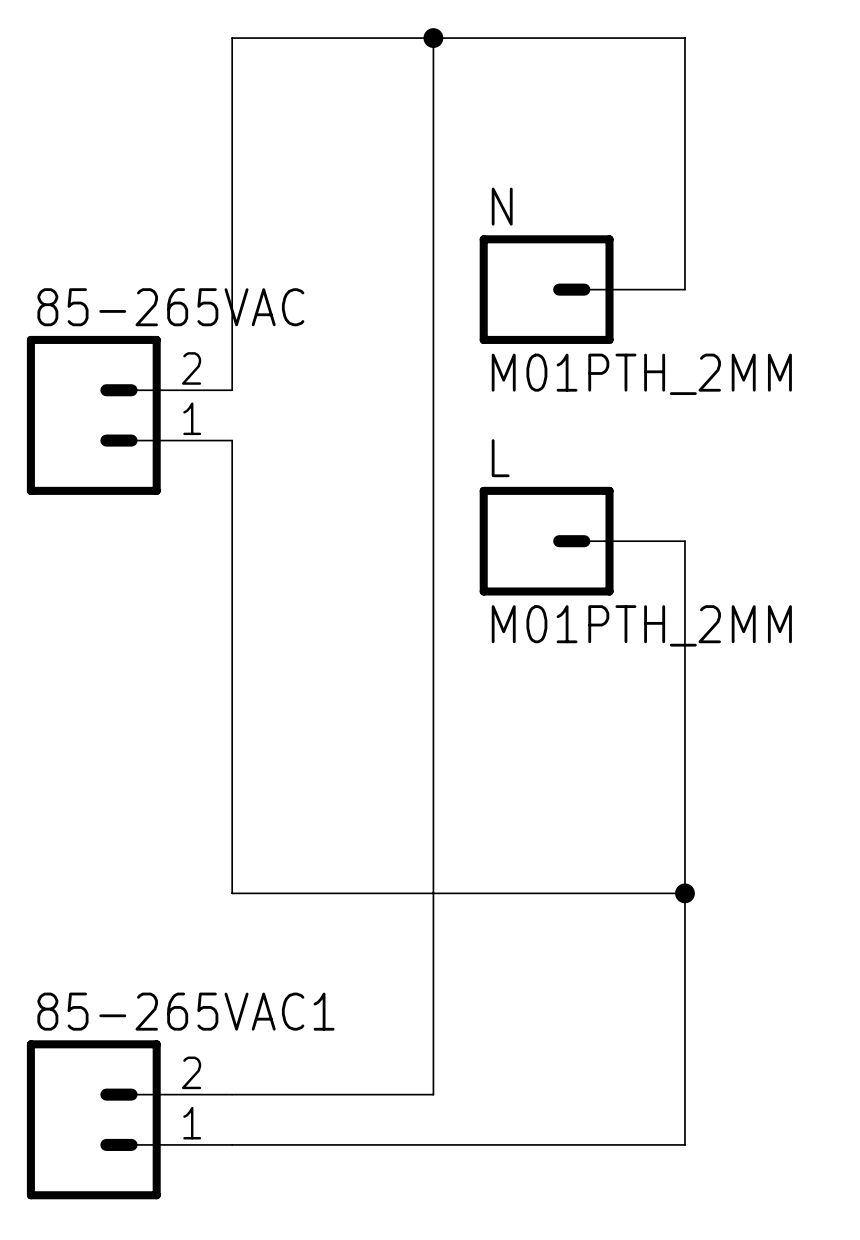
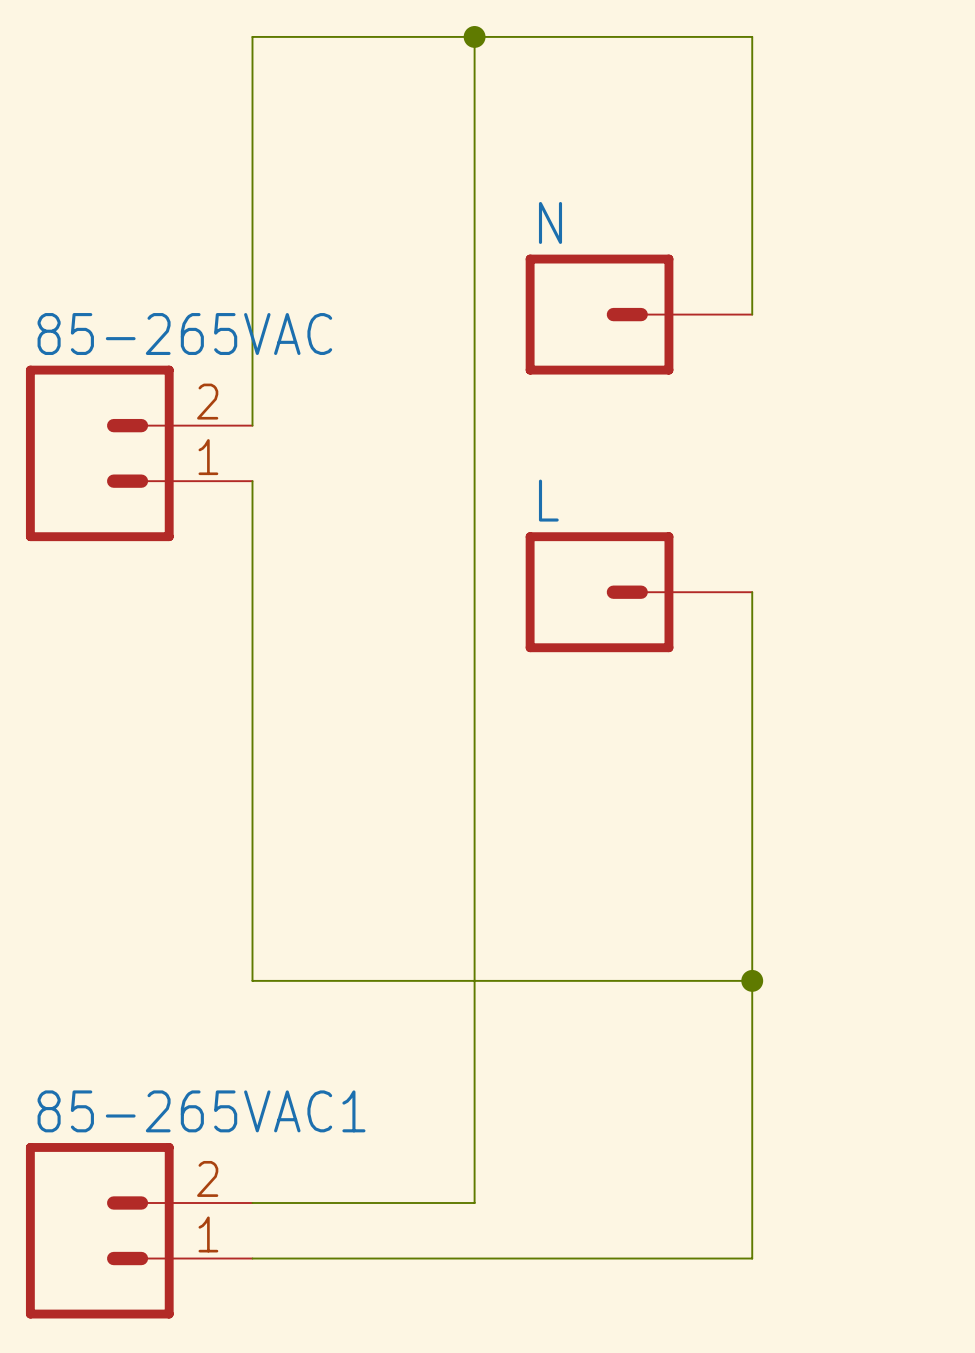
N value: M01PTH_2MM (641, 374) -> none
L value: M01PTH_2MM (641, 625) -> none

